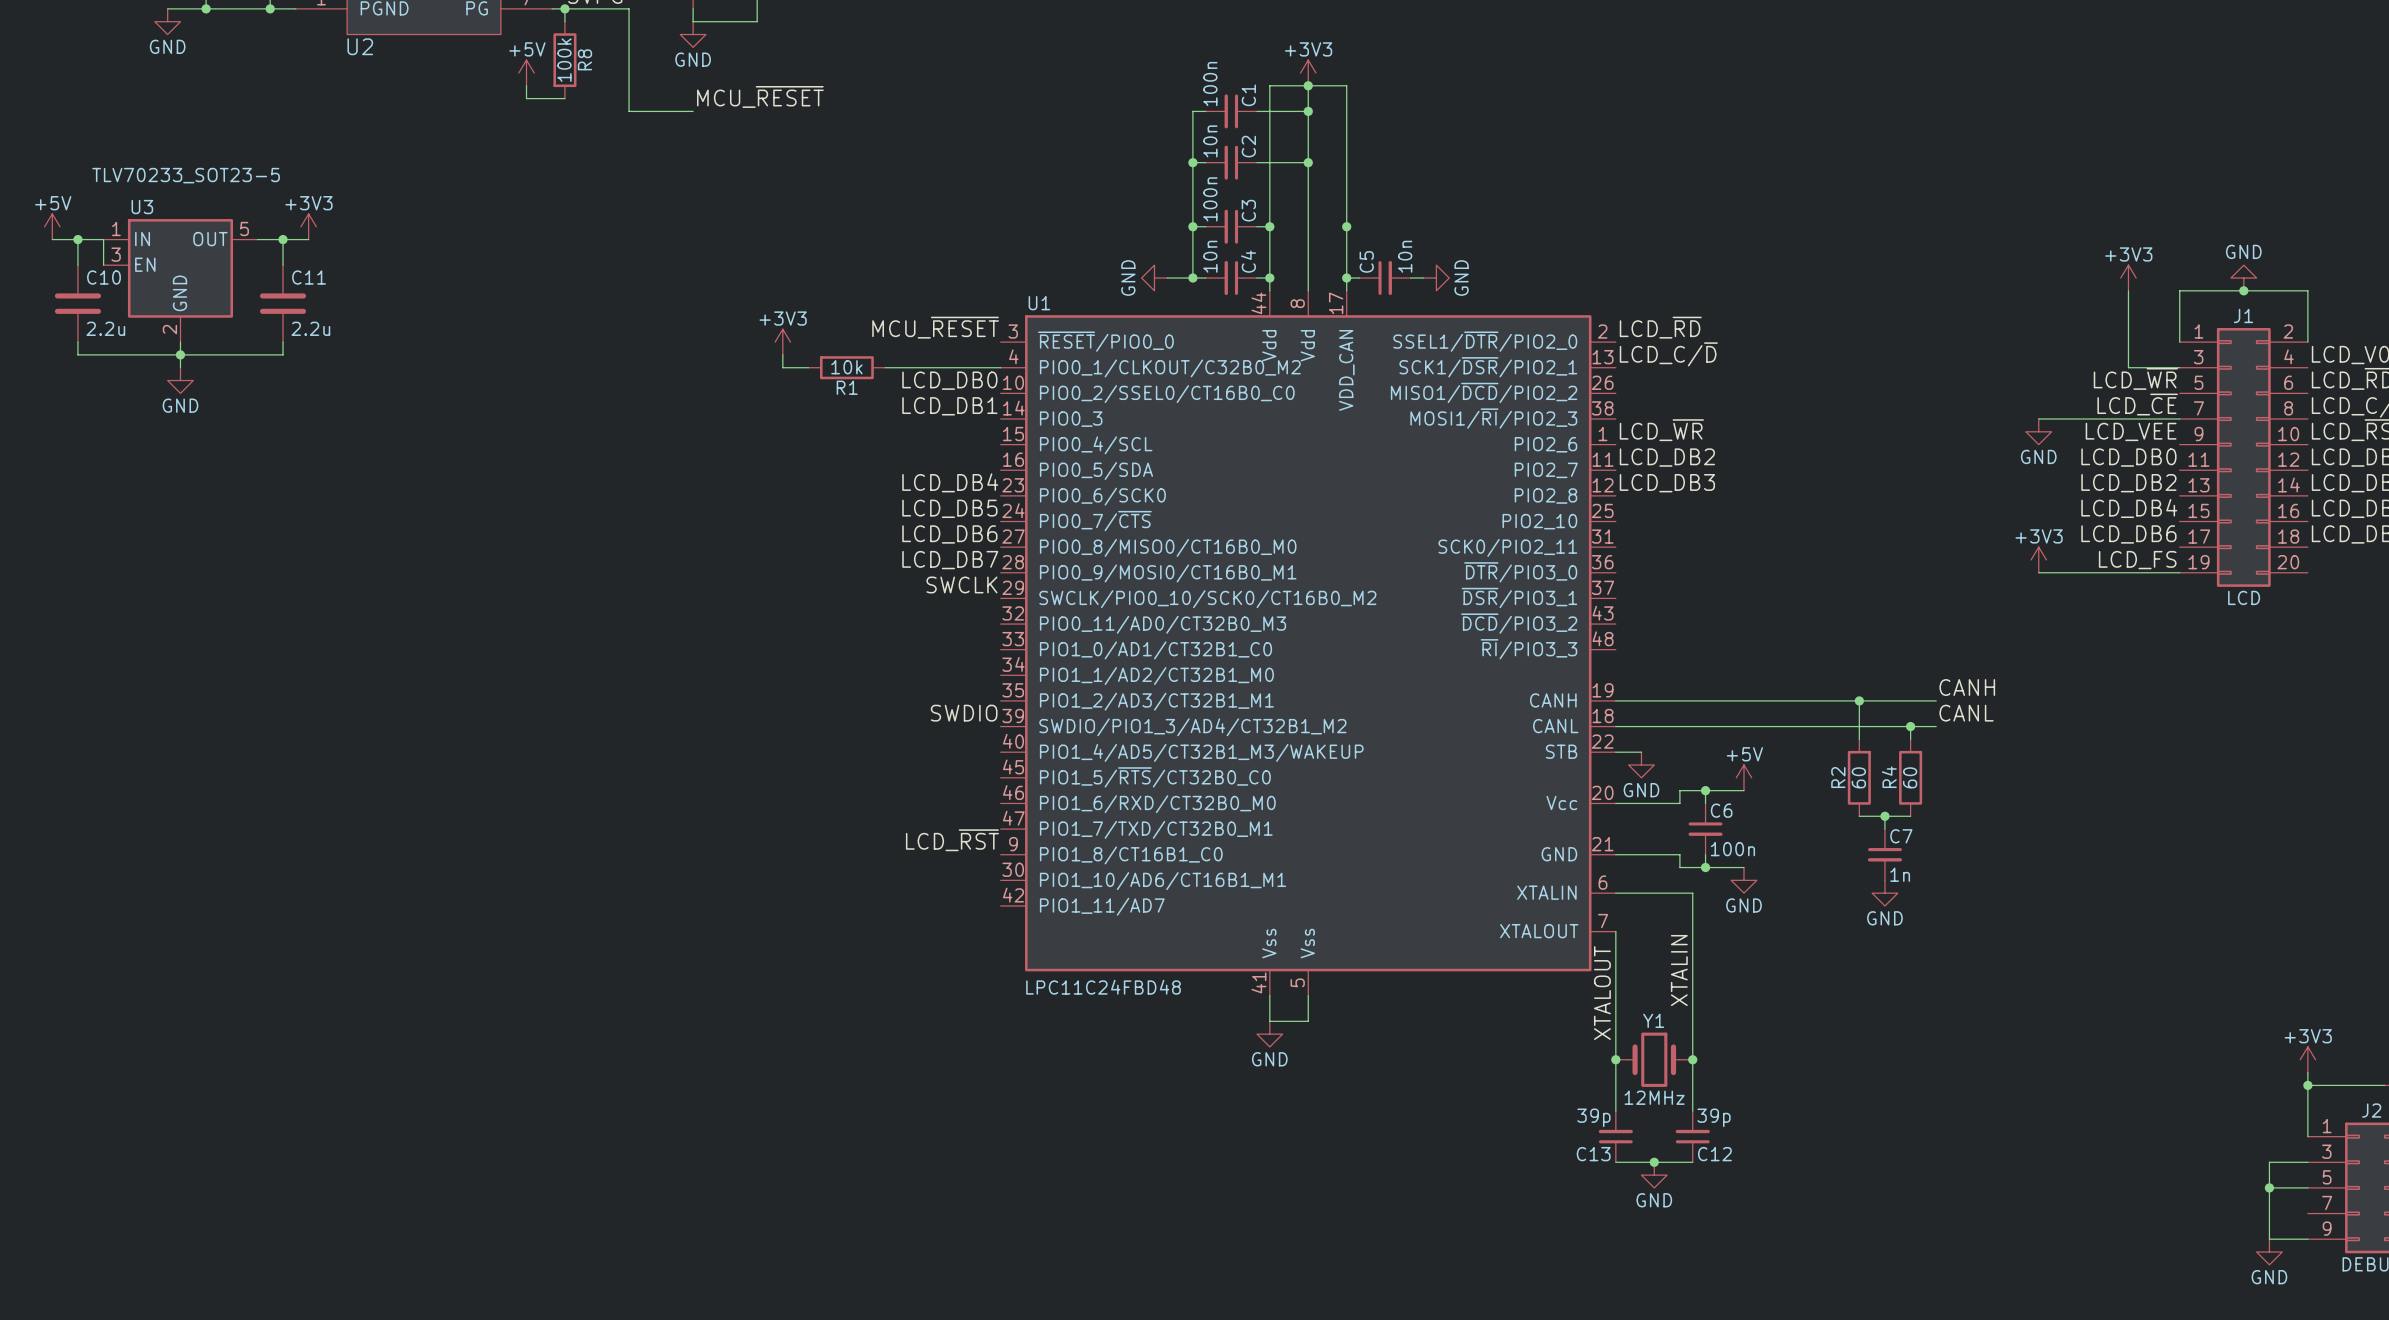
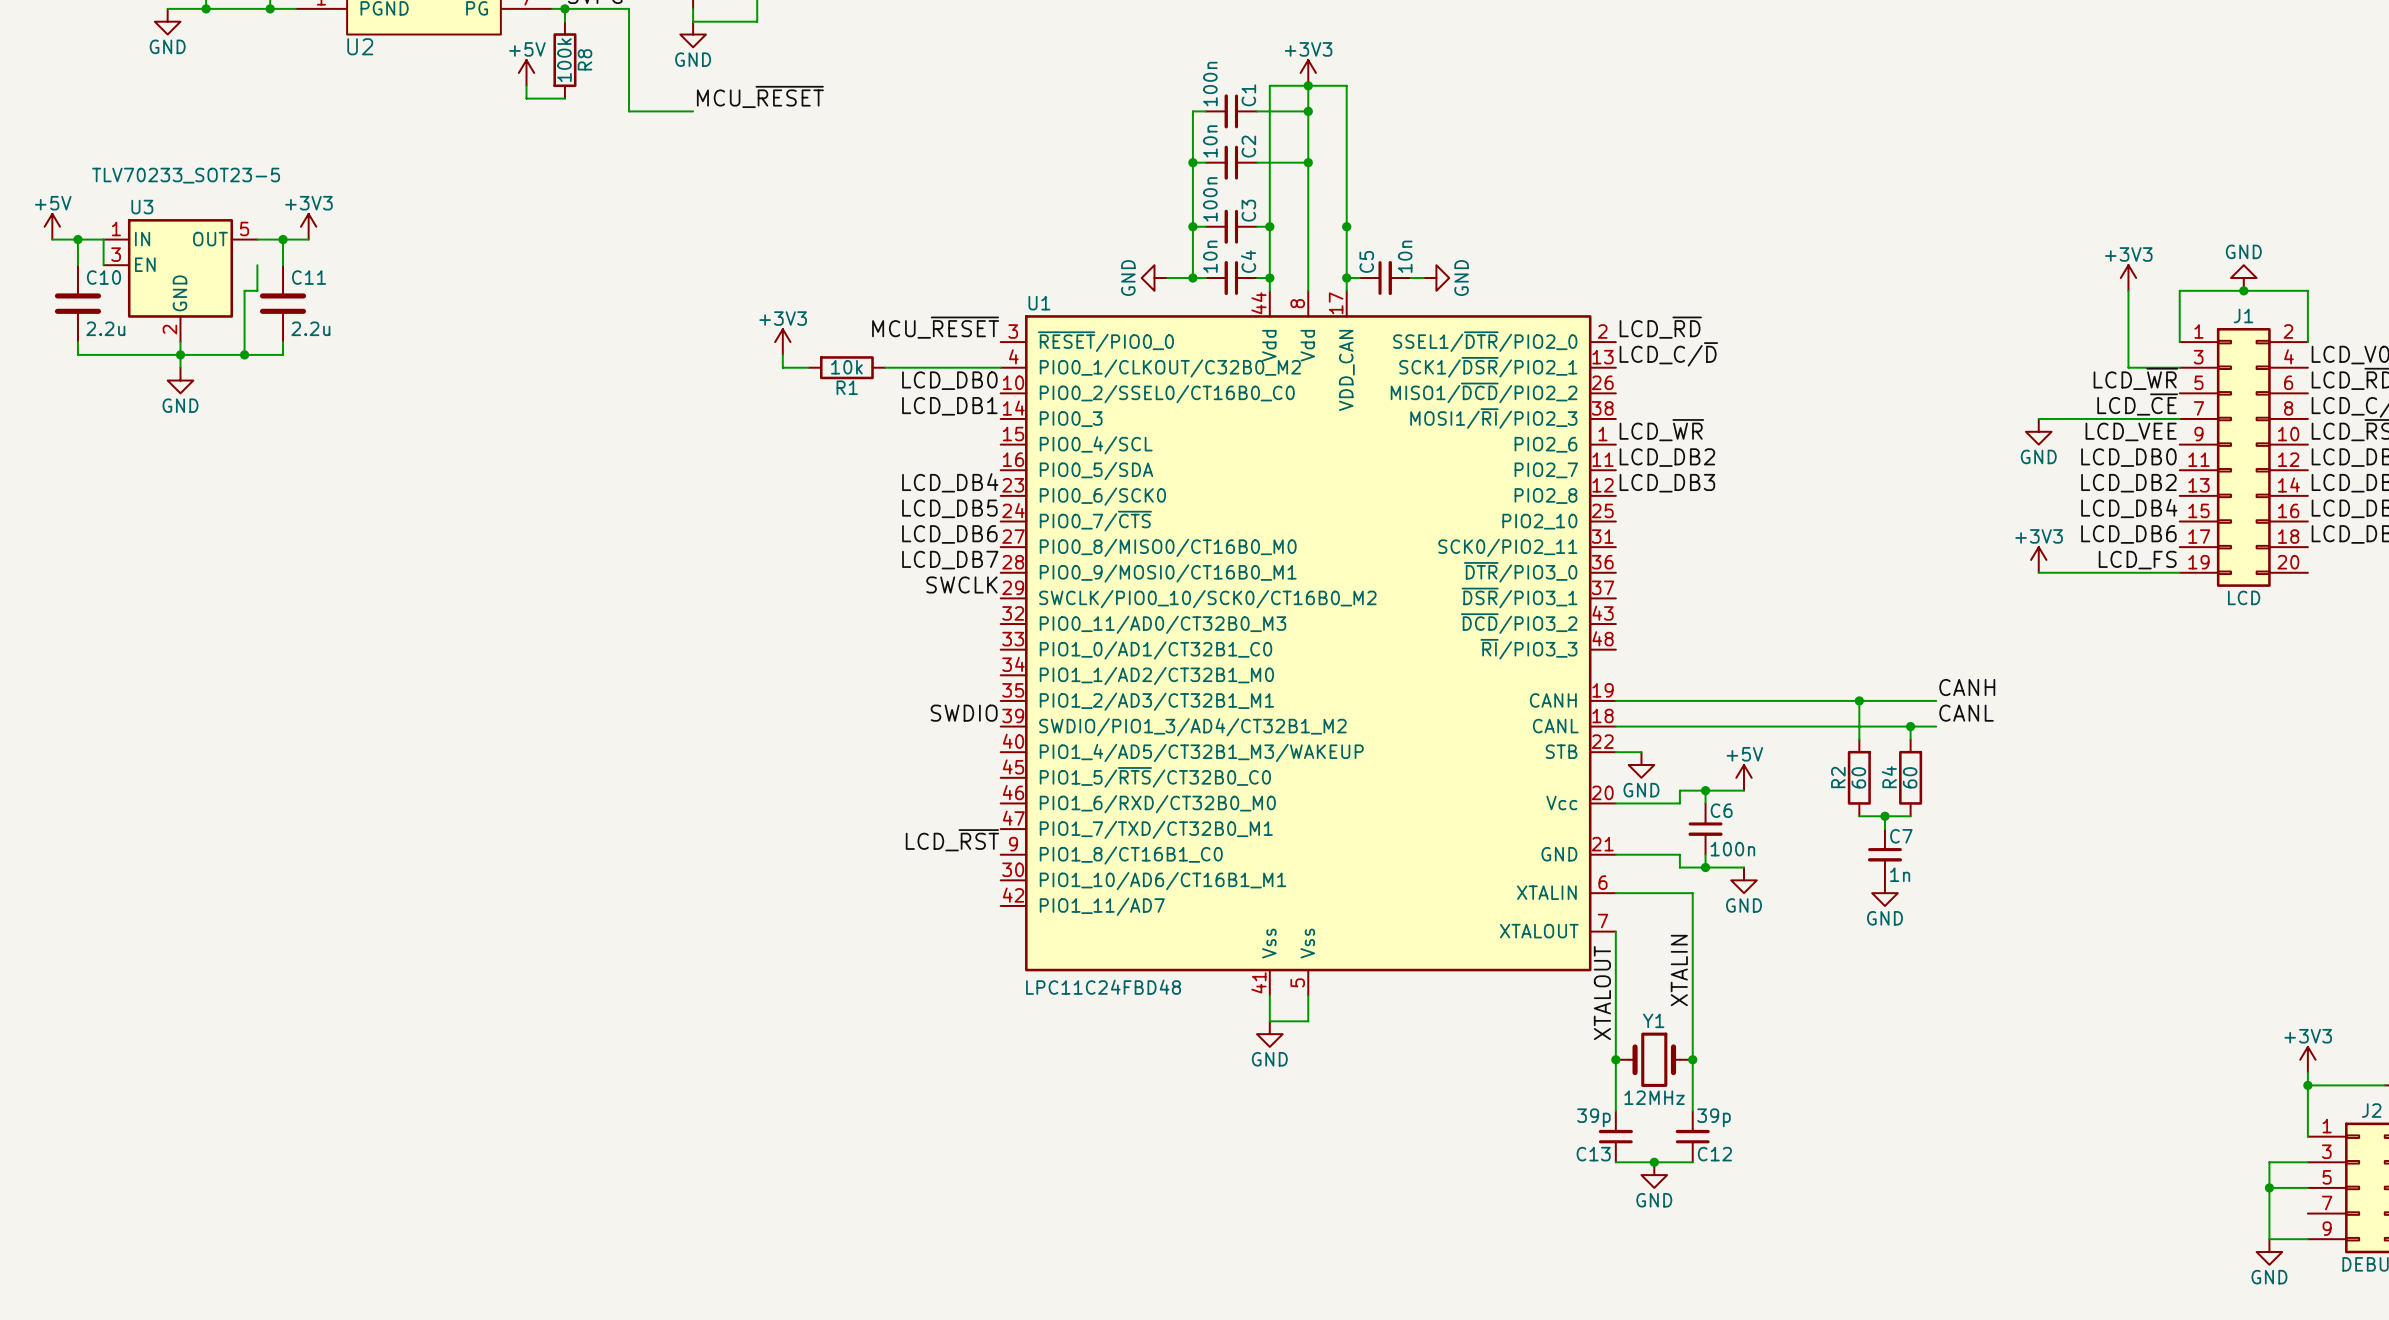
wire: none -> (257, 265) (257, 290) (244, 290) (244, 354)
junction: none -> (244, 354)

